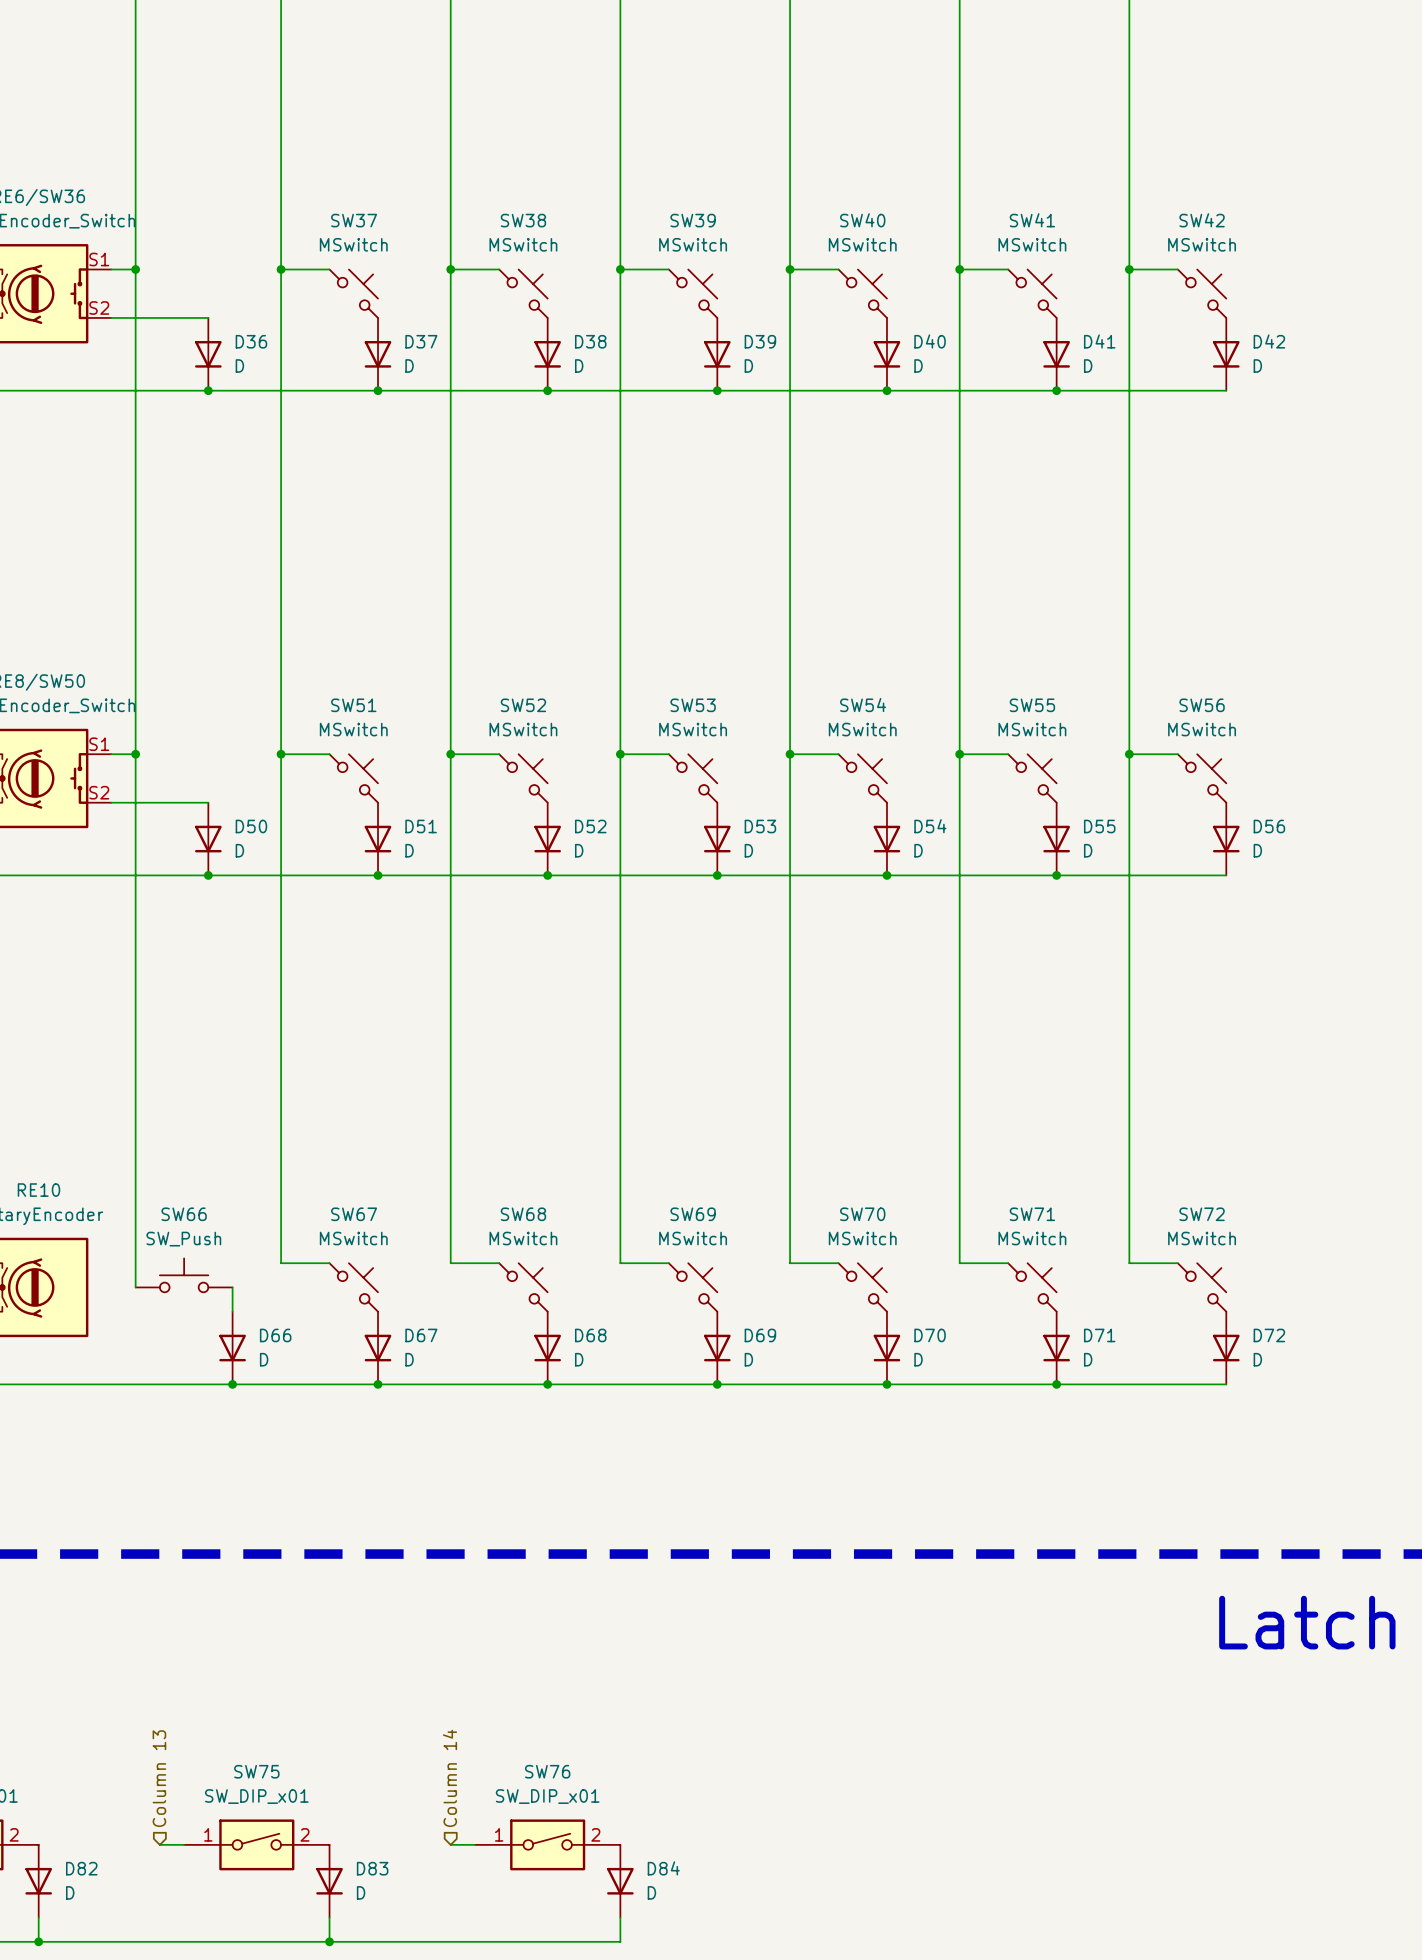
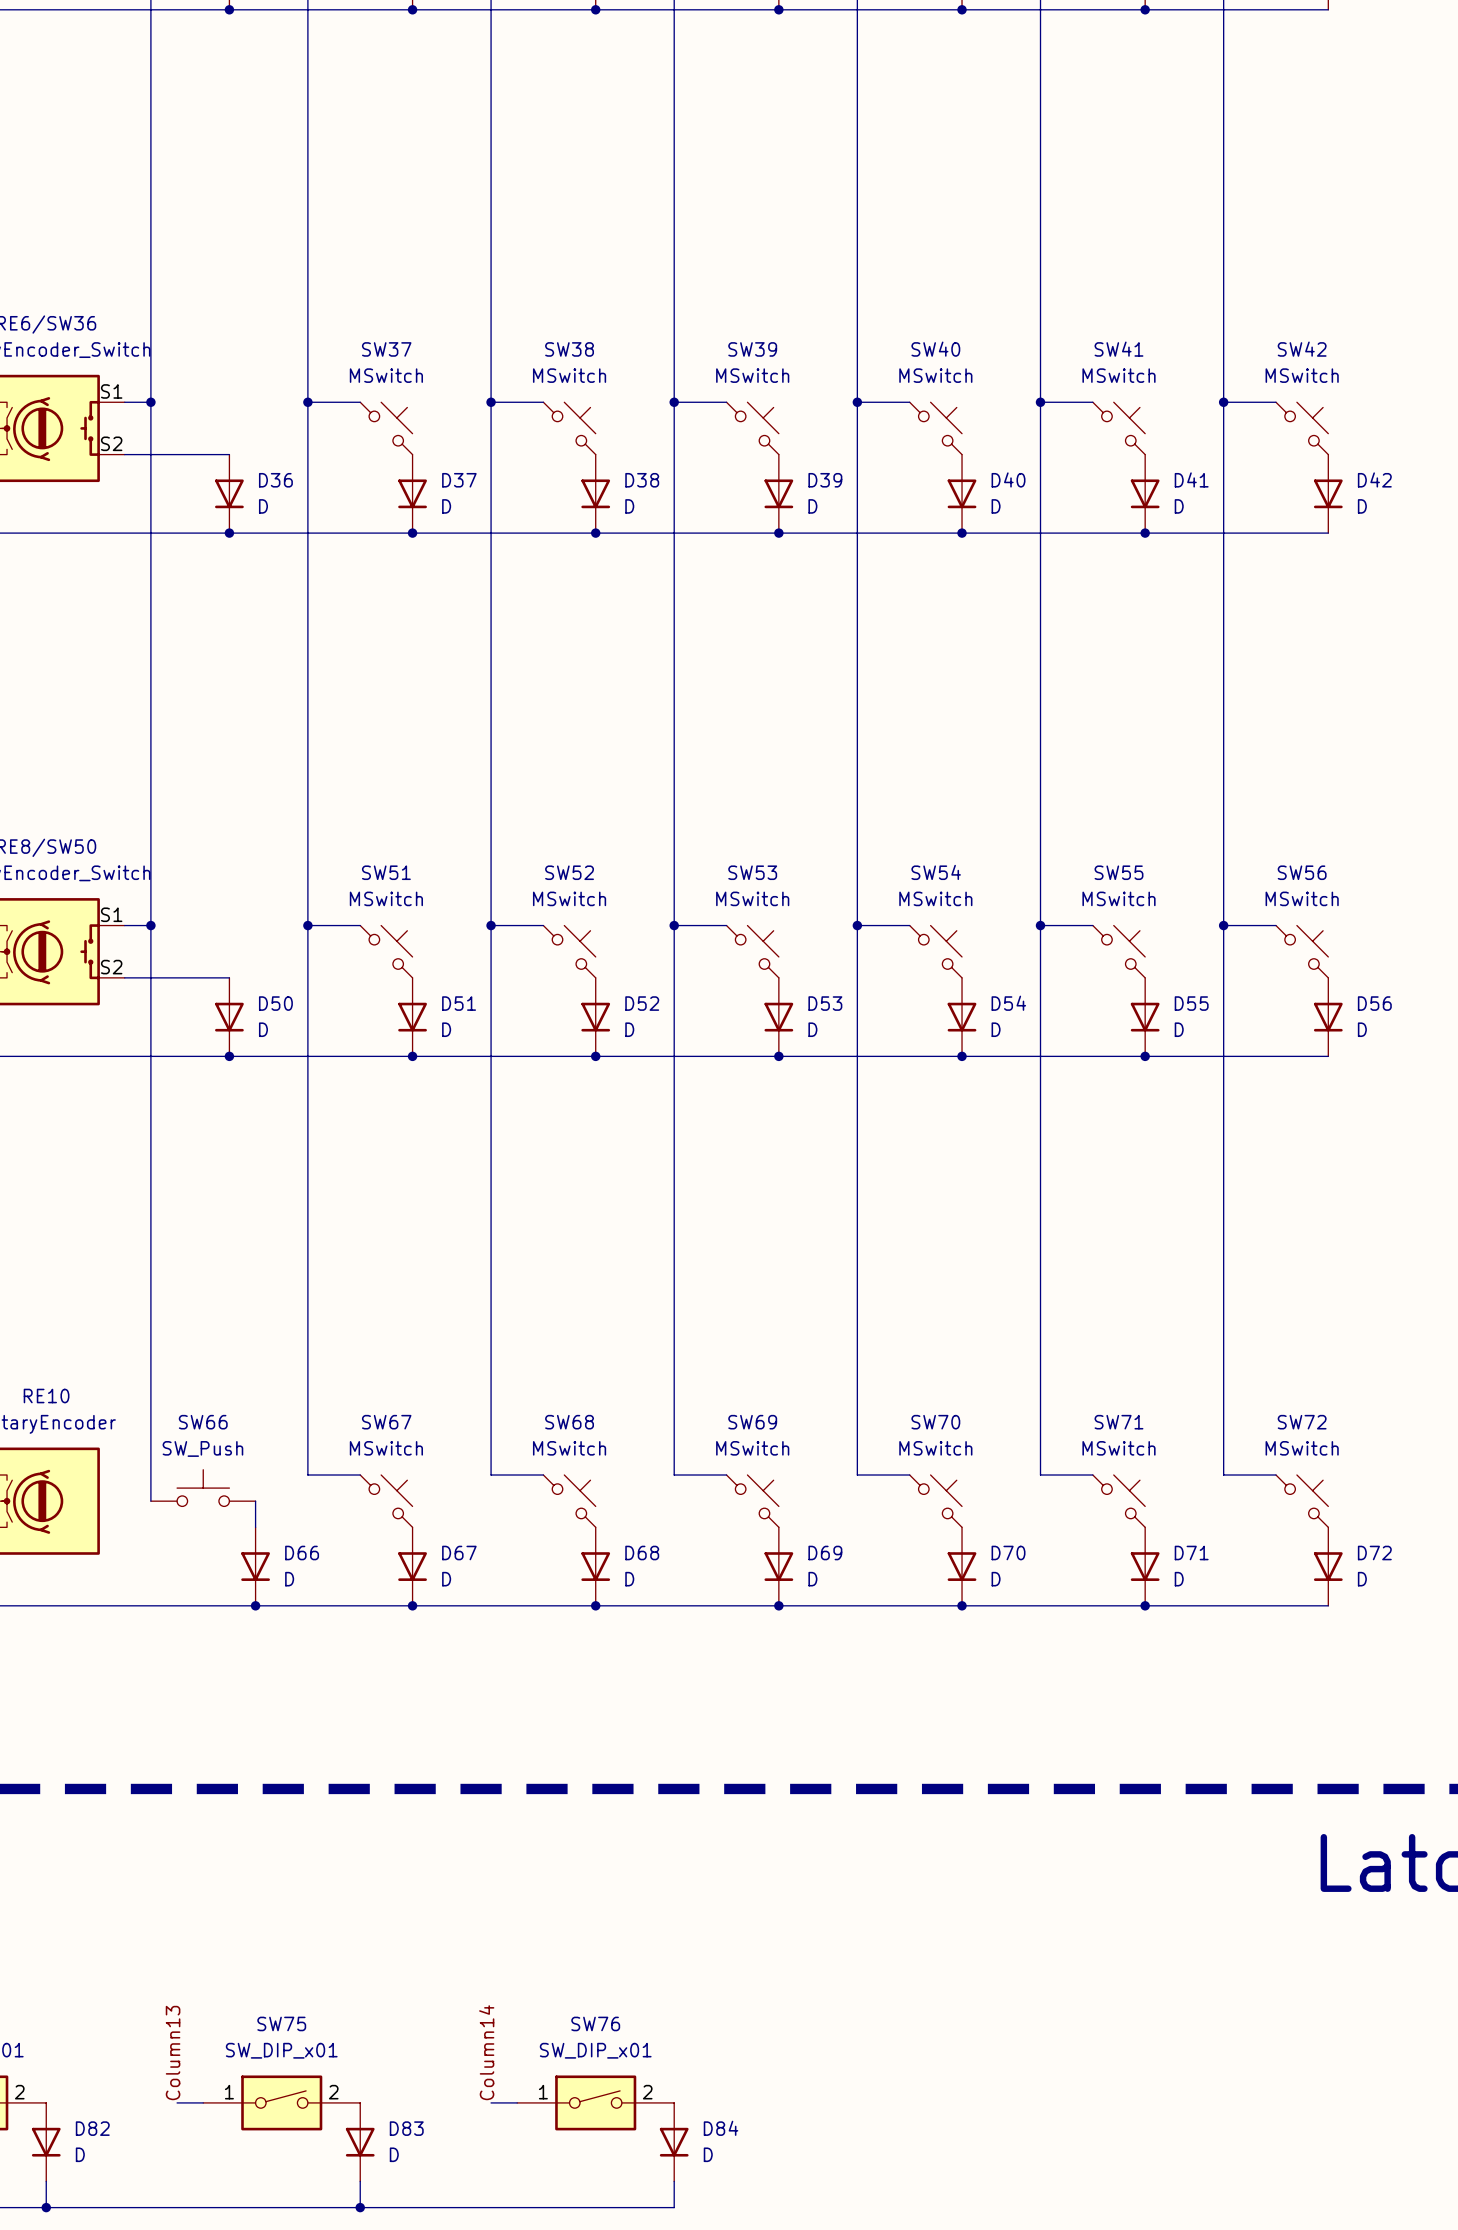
hierarchical label: Column 13 (159, 1778) -> none
hierarchical label: Column 14 (449, 1778) -> none
label: none -> Column13 (173, 2053)
label: none -> Column14 (486, 2052)

